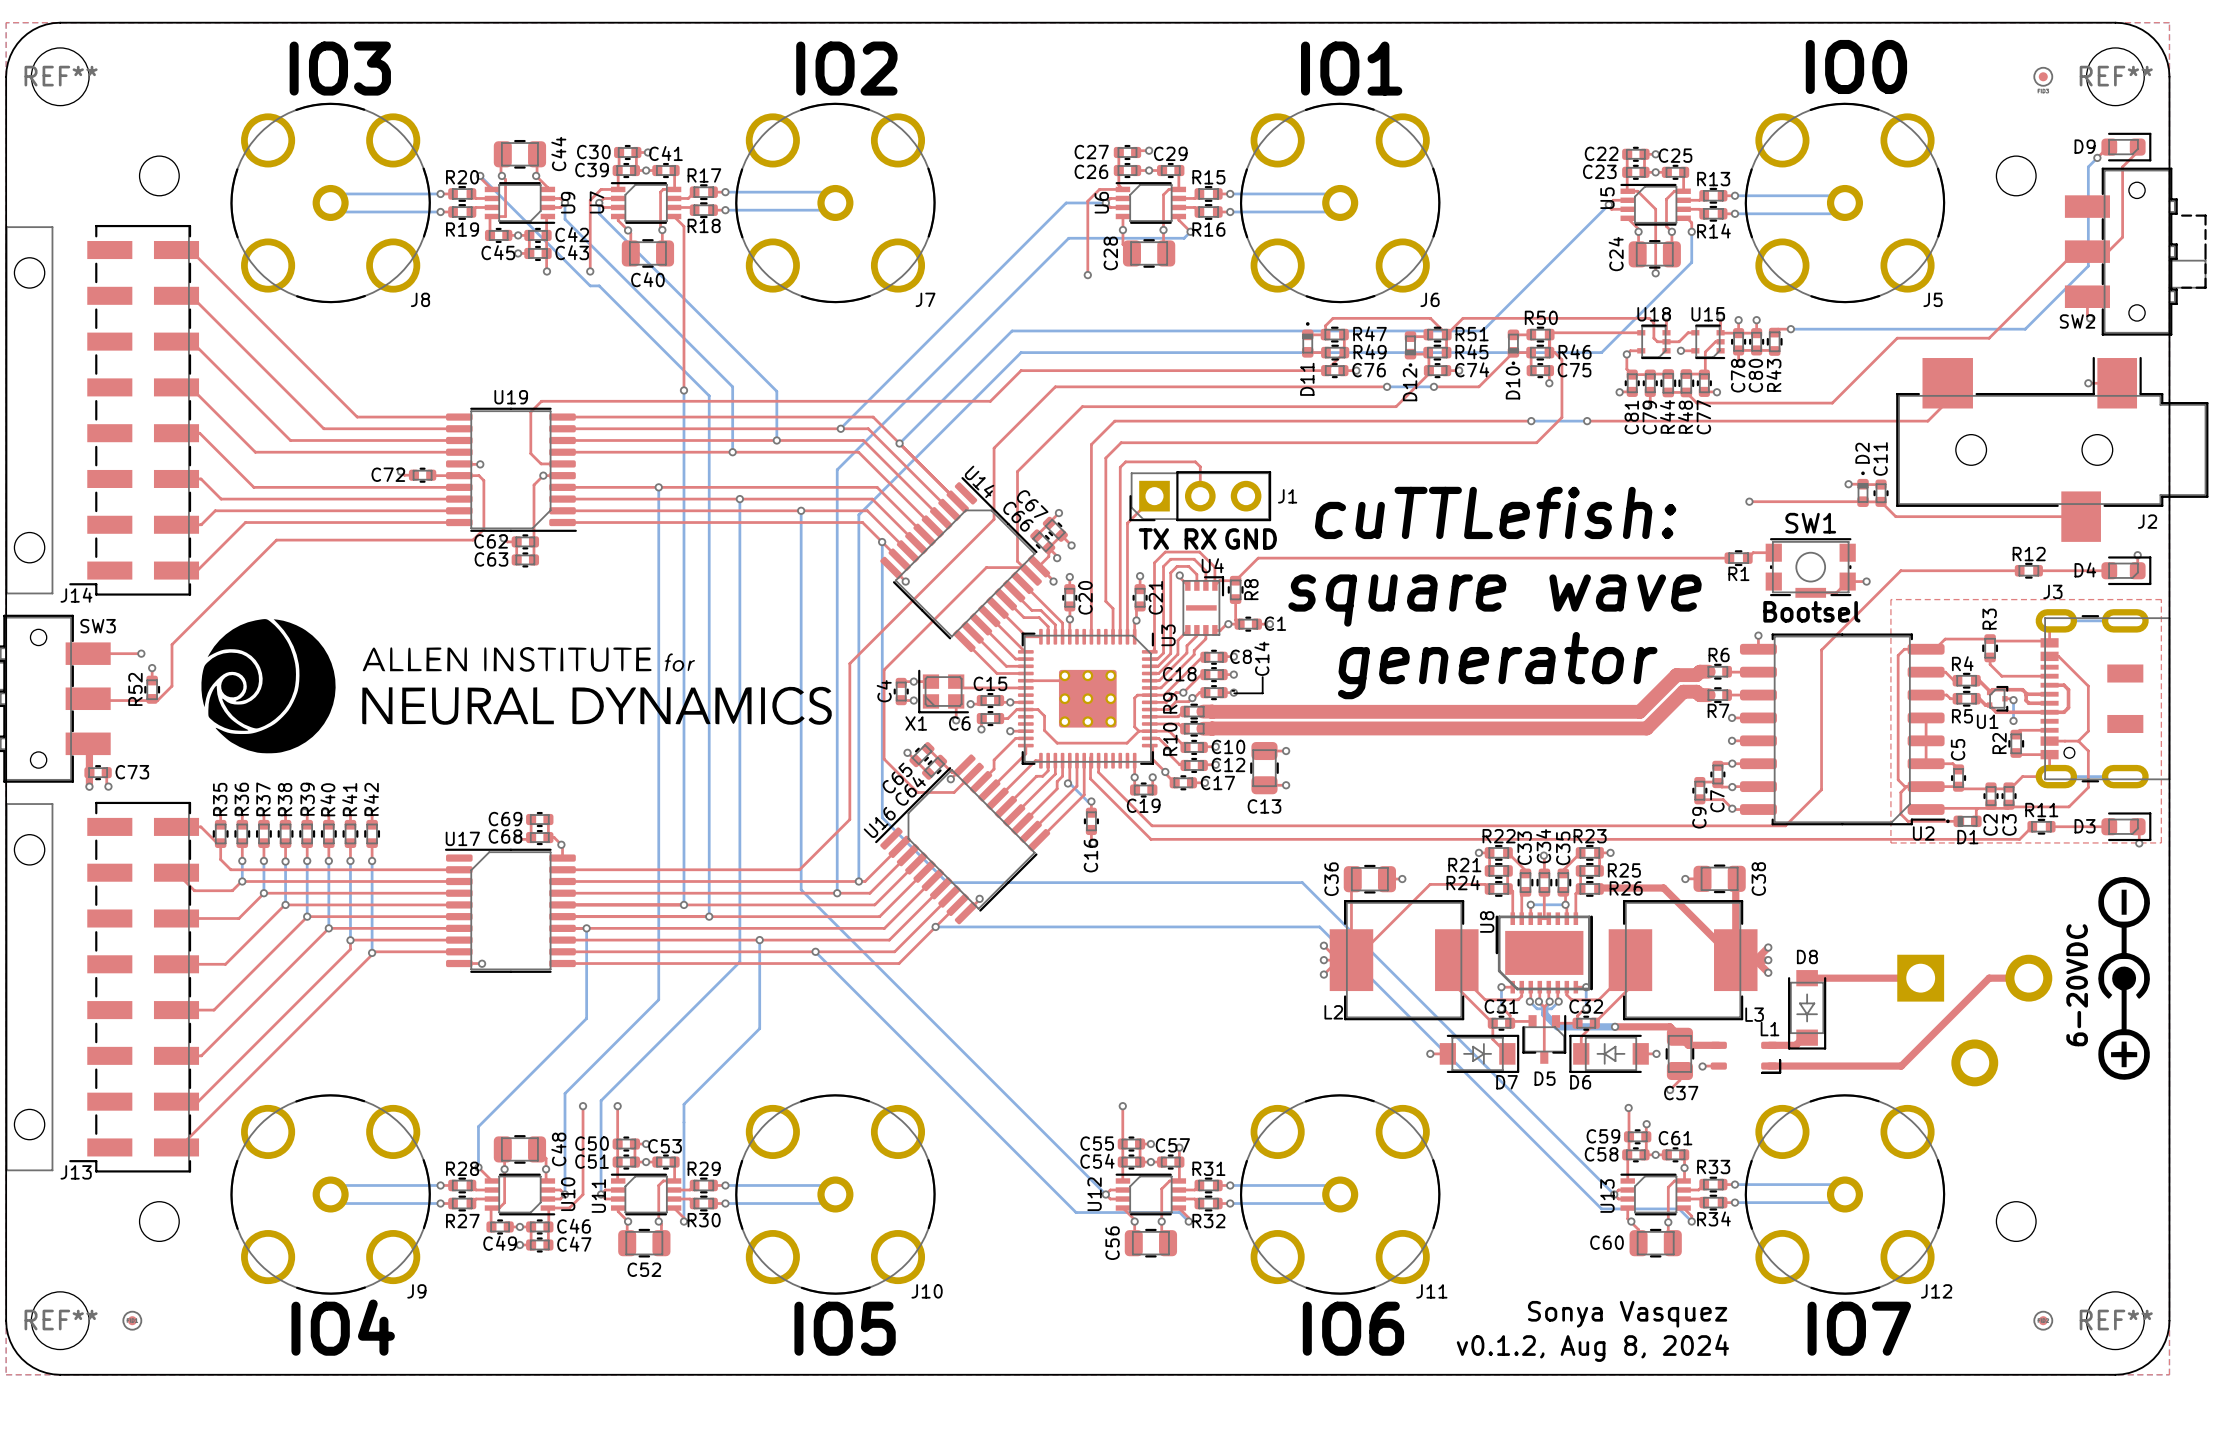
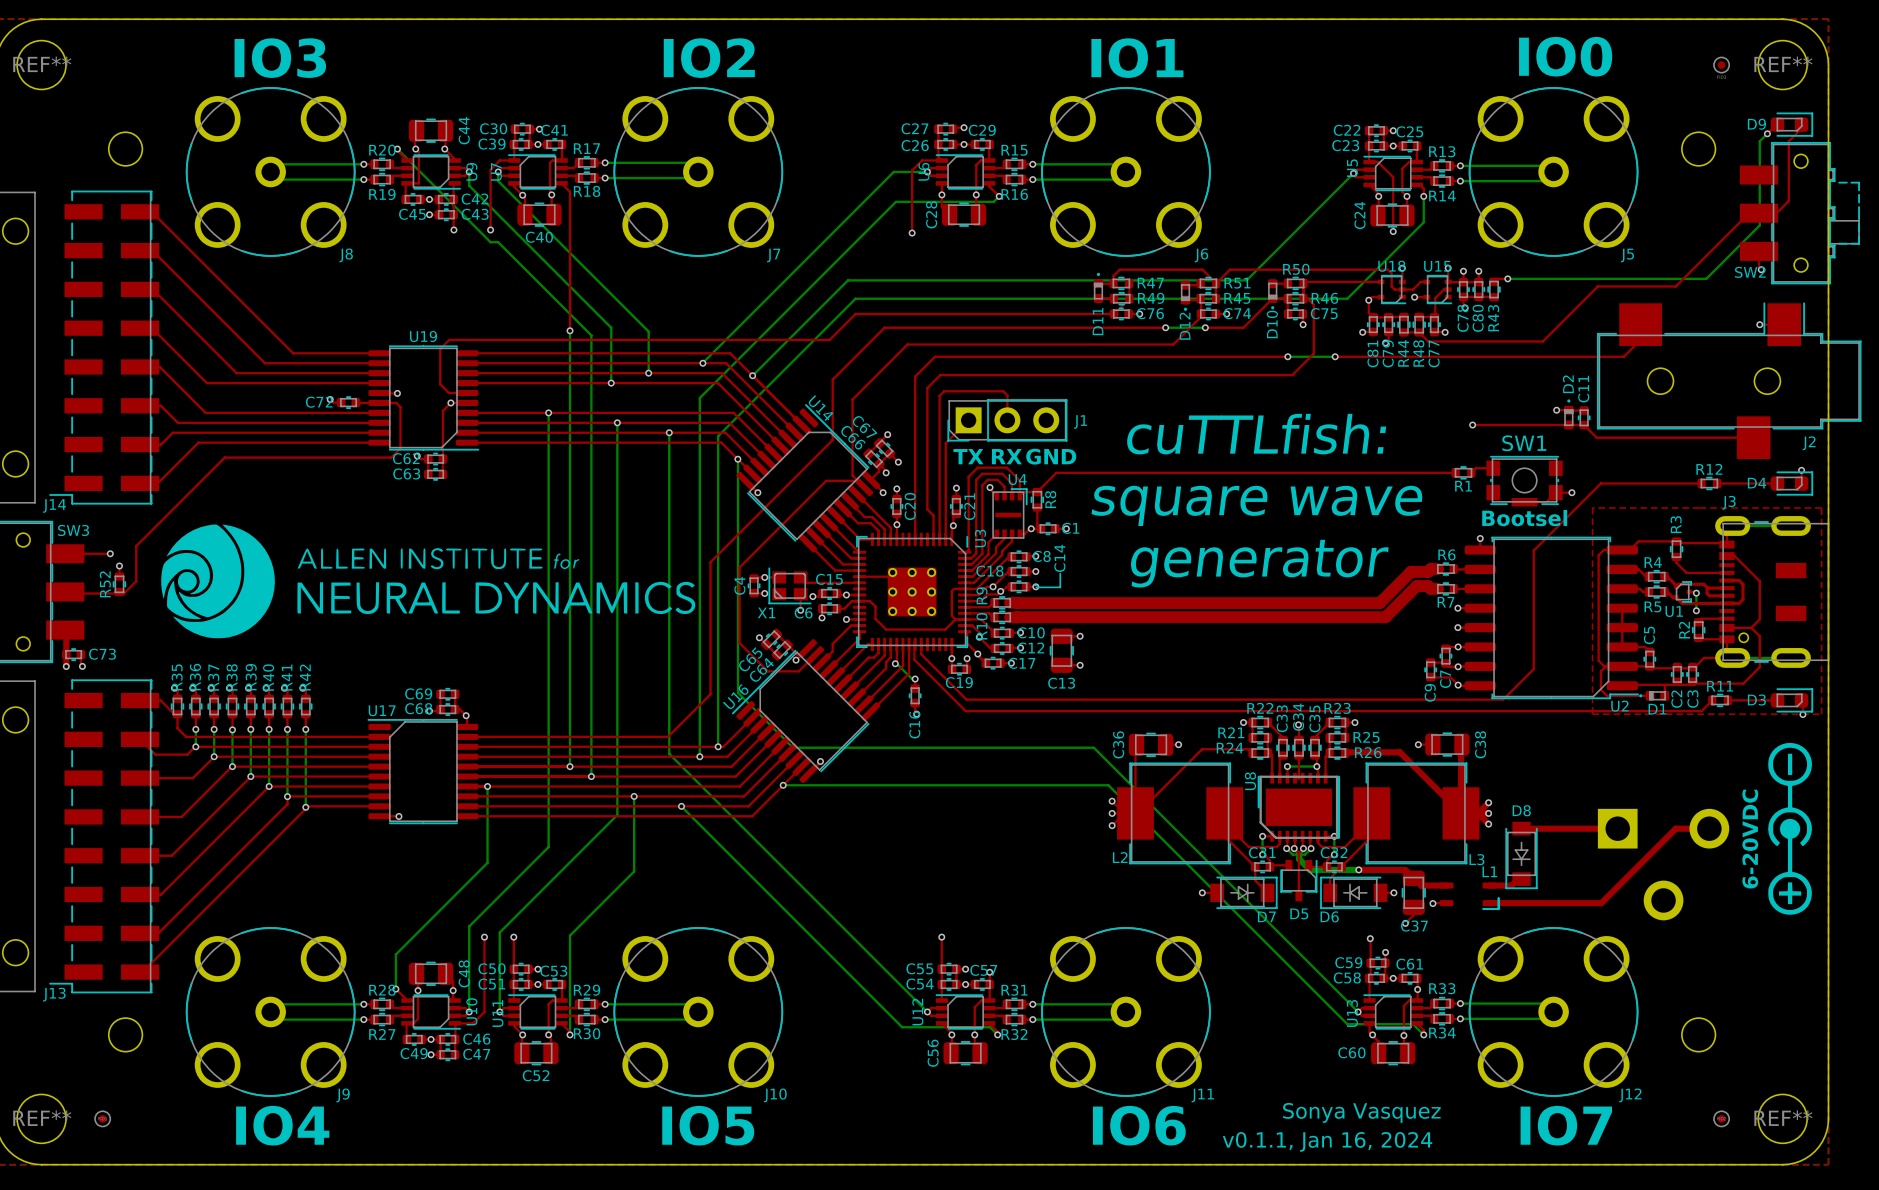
text: cuTTLefish: (1495, 512) -> cuTTLfish: (1256, 434)
text: v0.1.2, Aug 8, 2024 (1592, 1348) -> v0.1.1, Jan 16, 2024 (1327, 1141)

